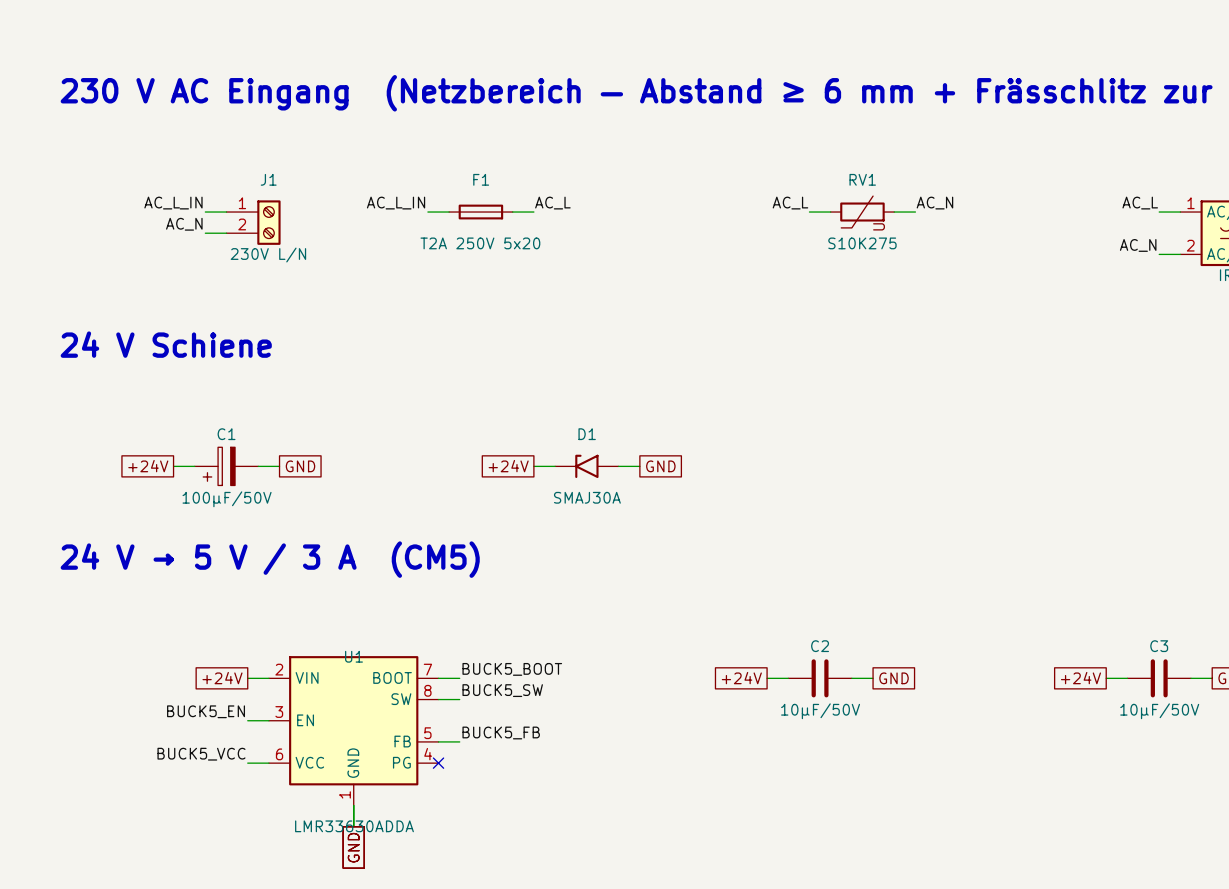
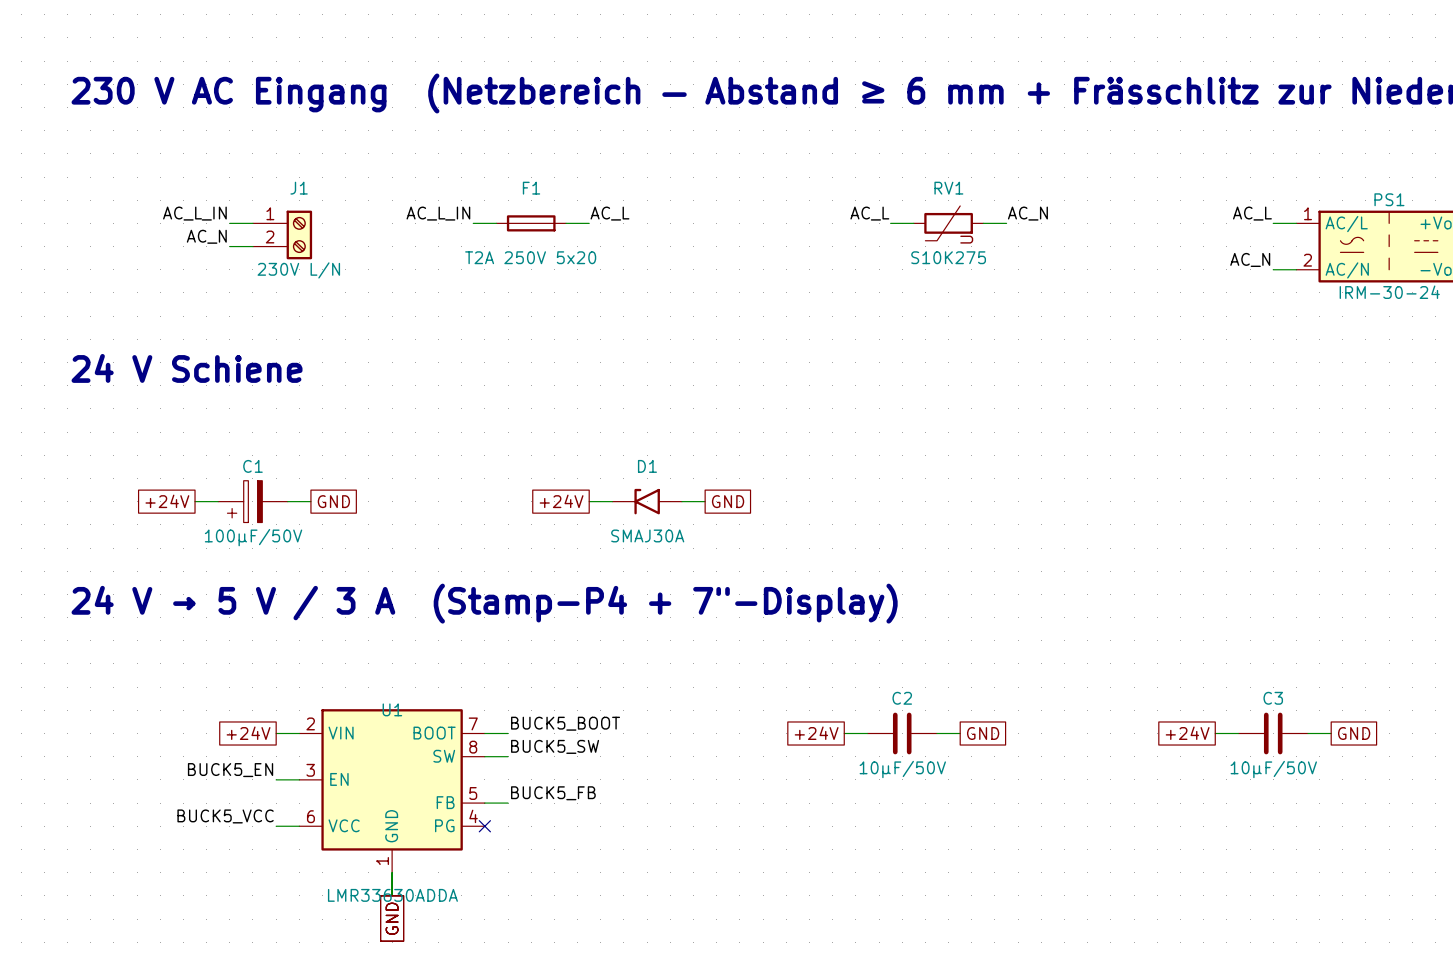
text: 24 V → 5 V / 3 A (CM5) (270, 559) -> 24 V → 5 V / 3 A (Stamp-P4 + 7"-Display) (484, 603)

